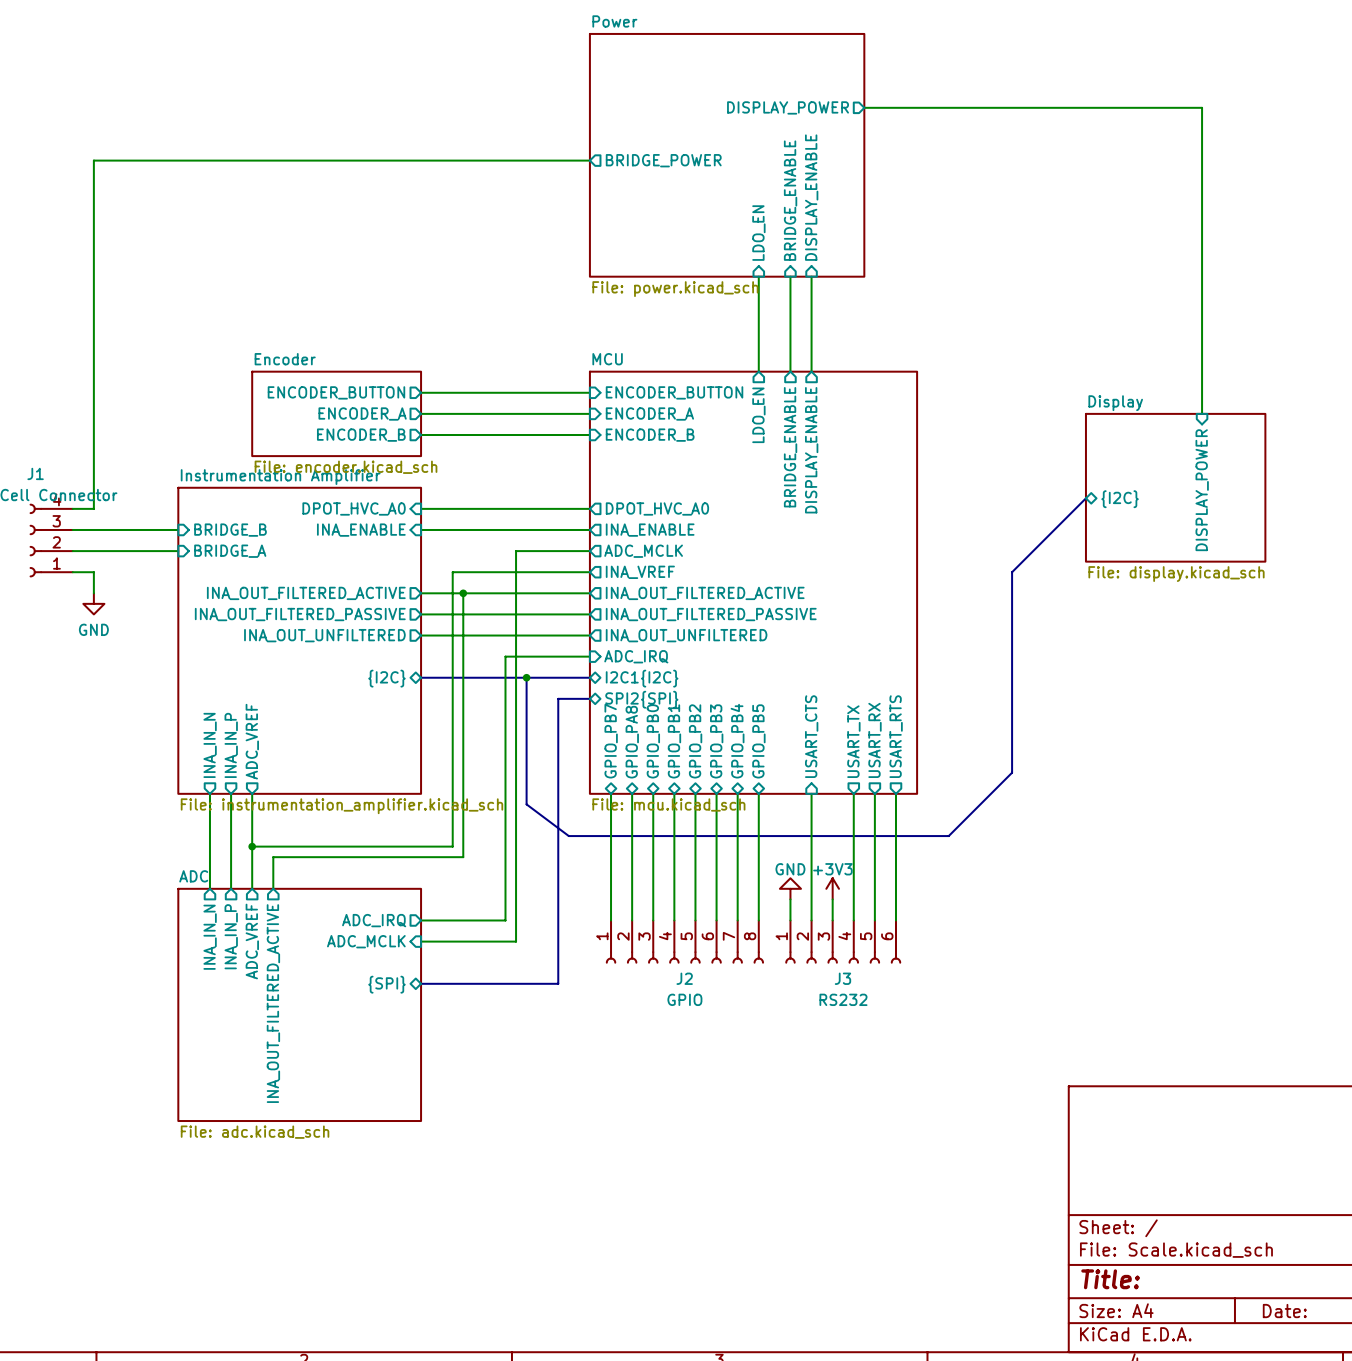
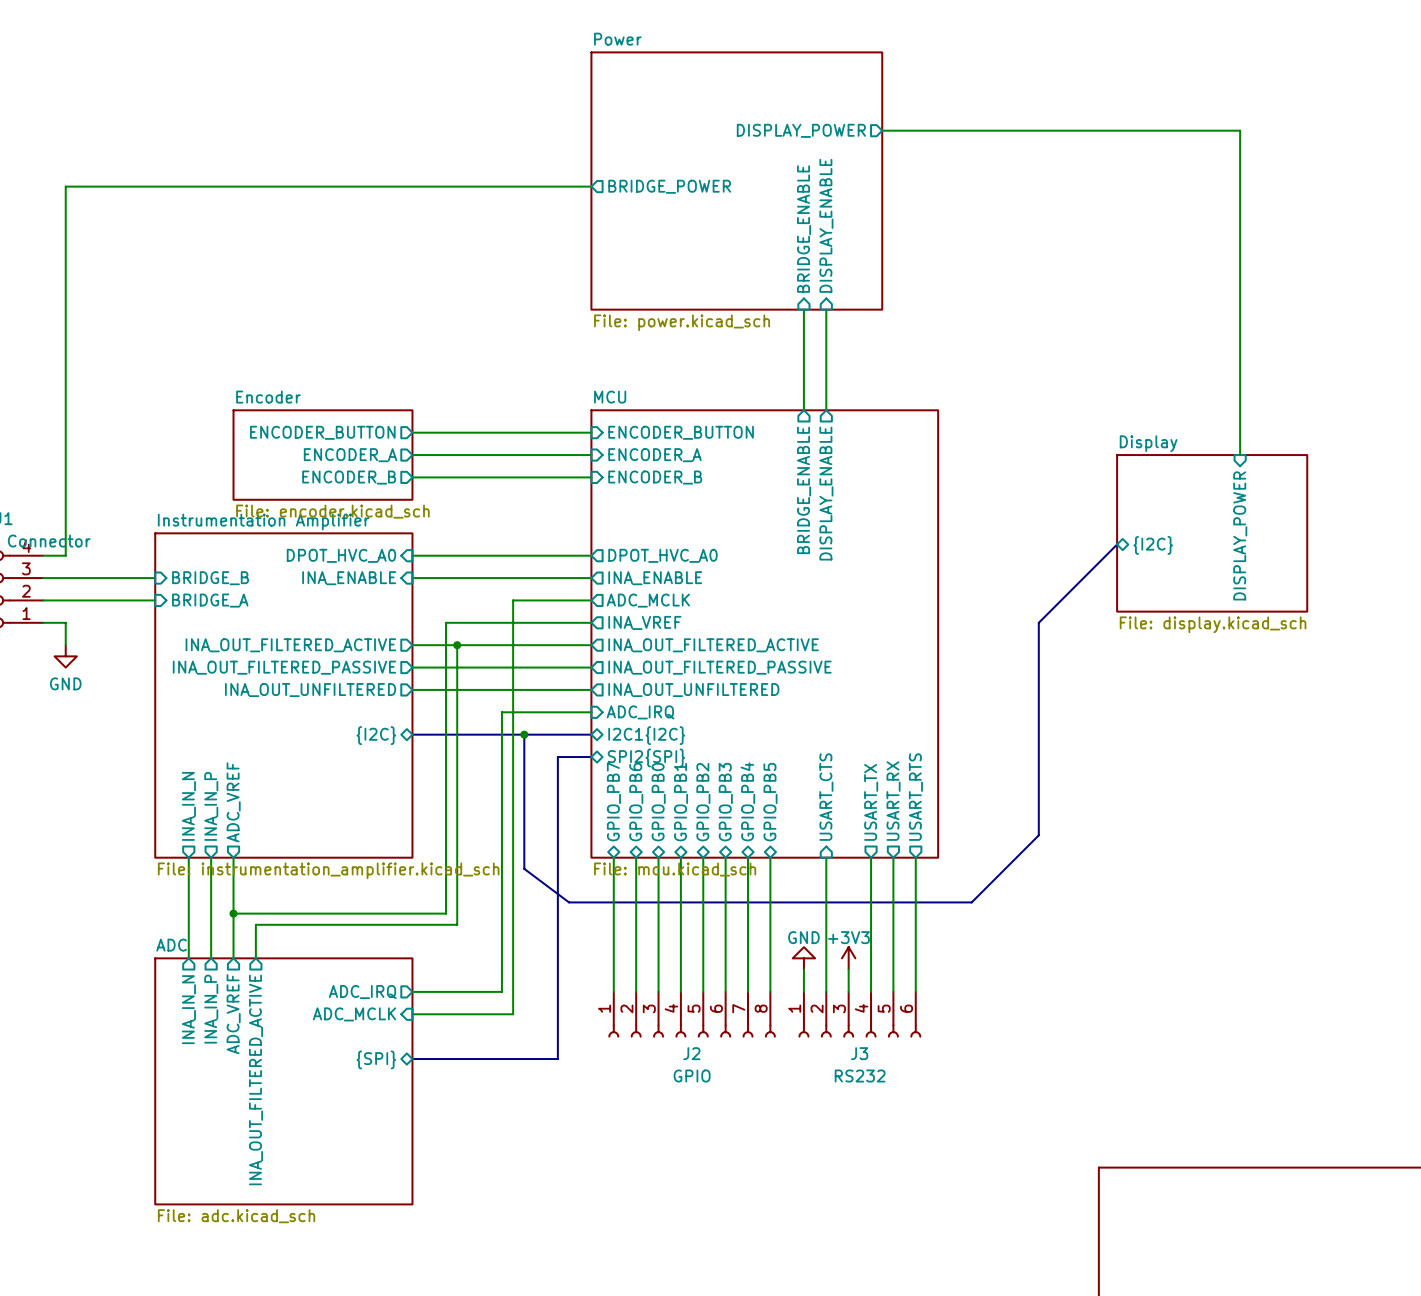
sheet pin: LDO_EN (758, 233) -> none
wire: (758, 276) (758, 371) -> none
sheet pin: LDO_EN (758, 415) -> none
sheet pin: GPIO_PA8 (632, 742) -> GPIO_PB6 (636, 802)

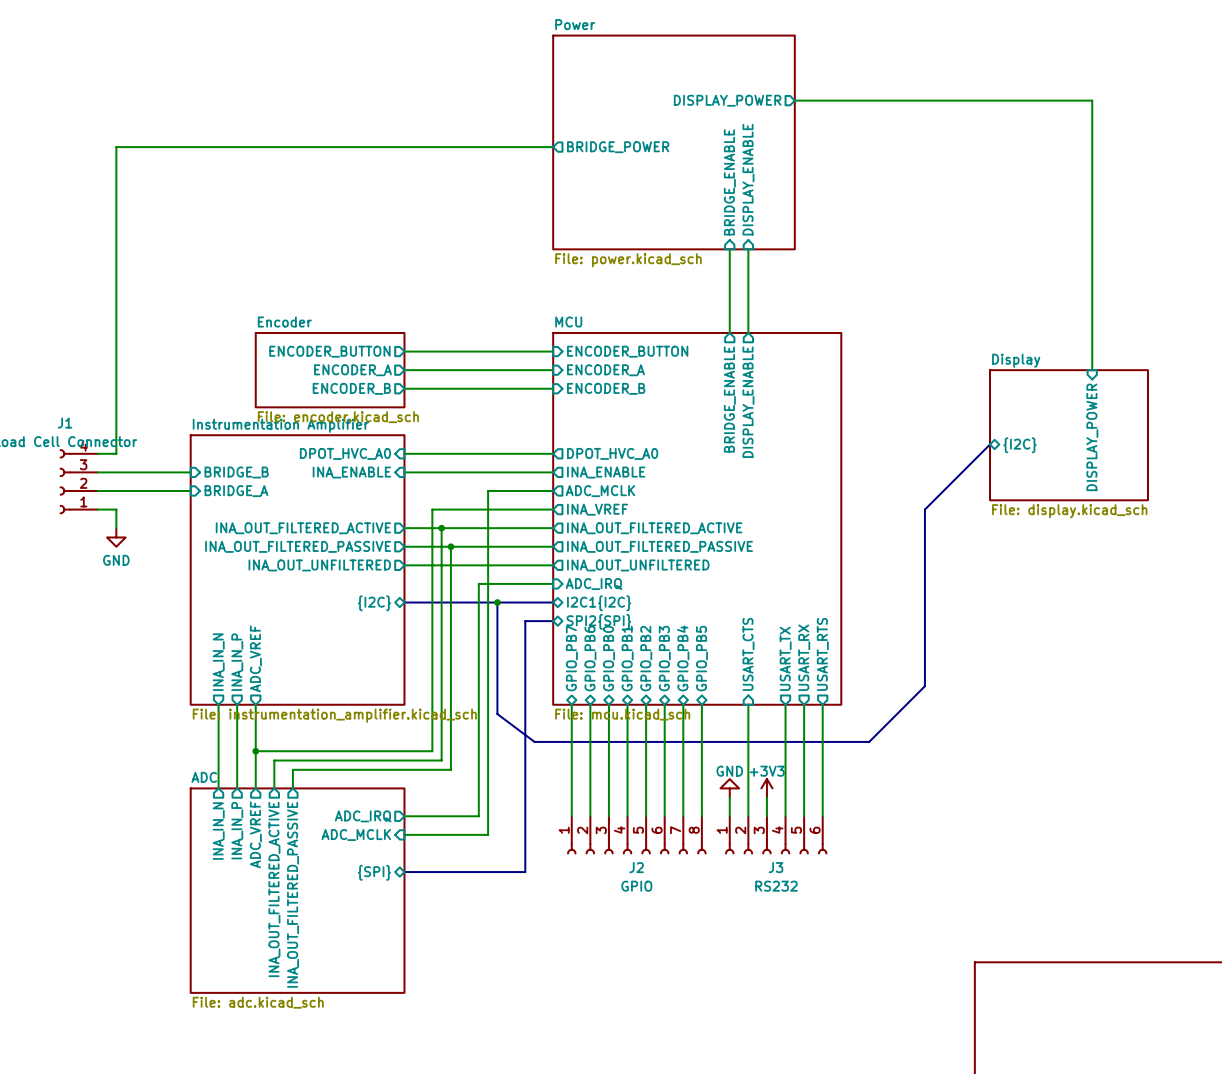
wire: none -> (450, 546) (450, 769) (292, 769) (292, 788)
junction: none -> (450, 546)
sheet pin: none -> INA_OUT_FILTERED_PASSIVE (293, 894)

